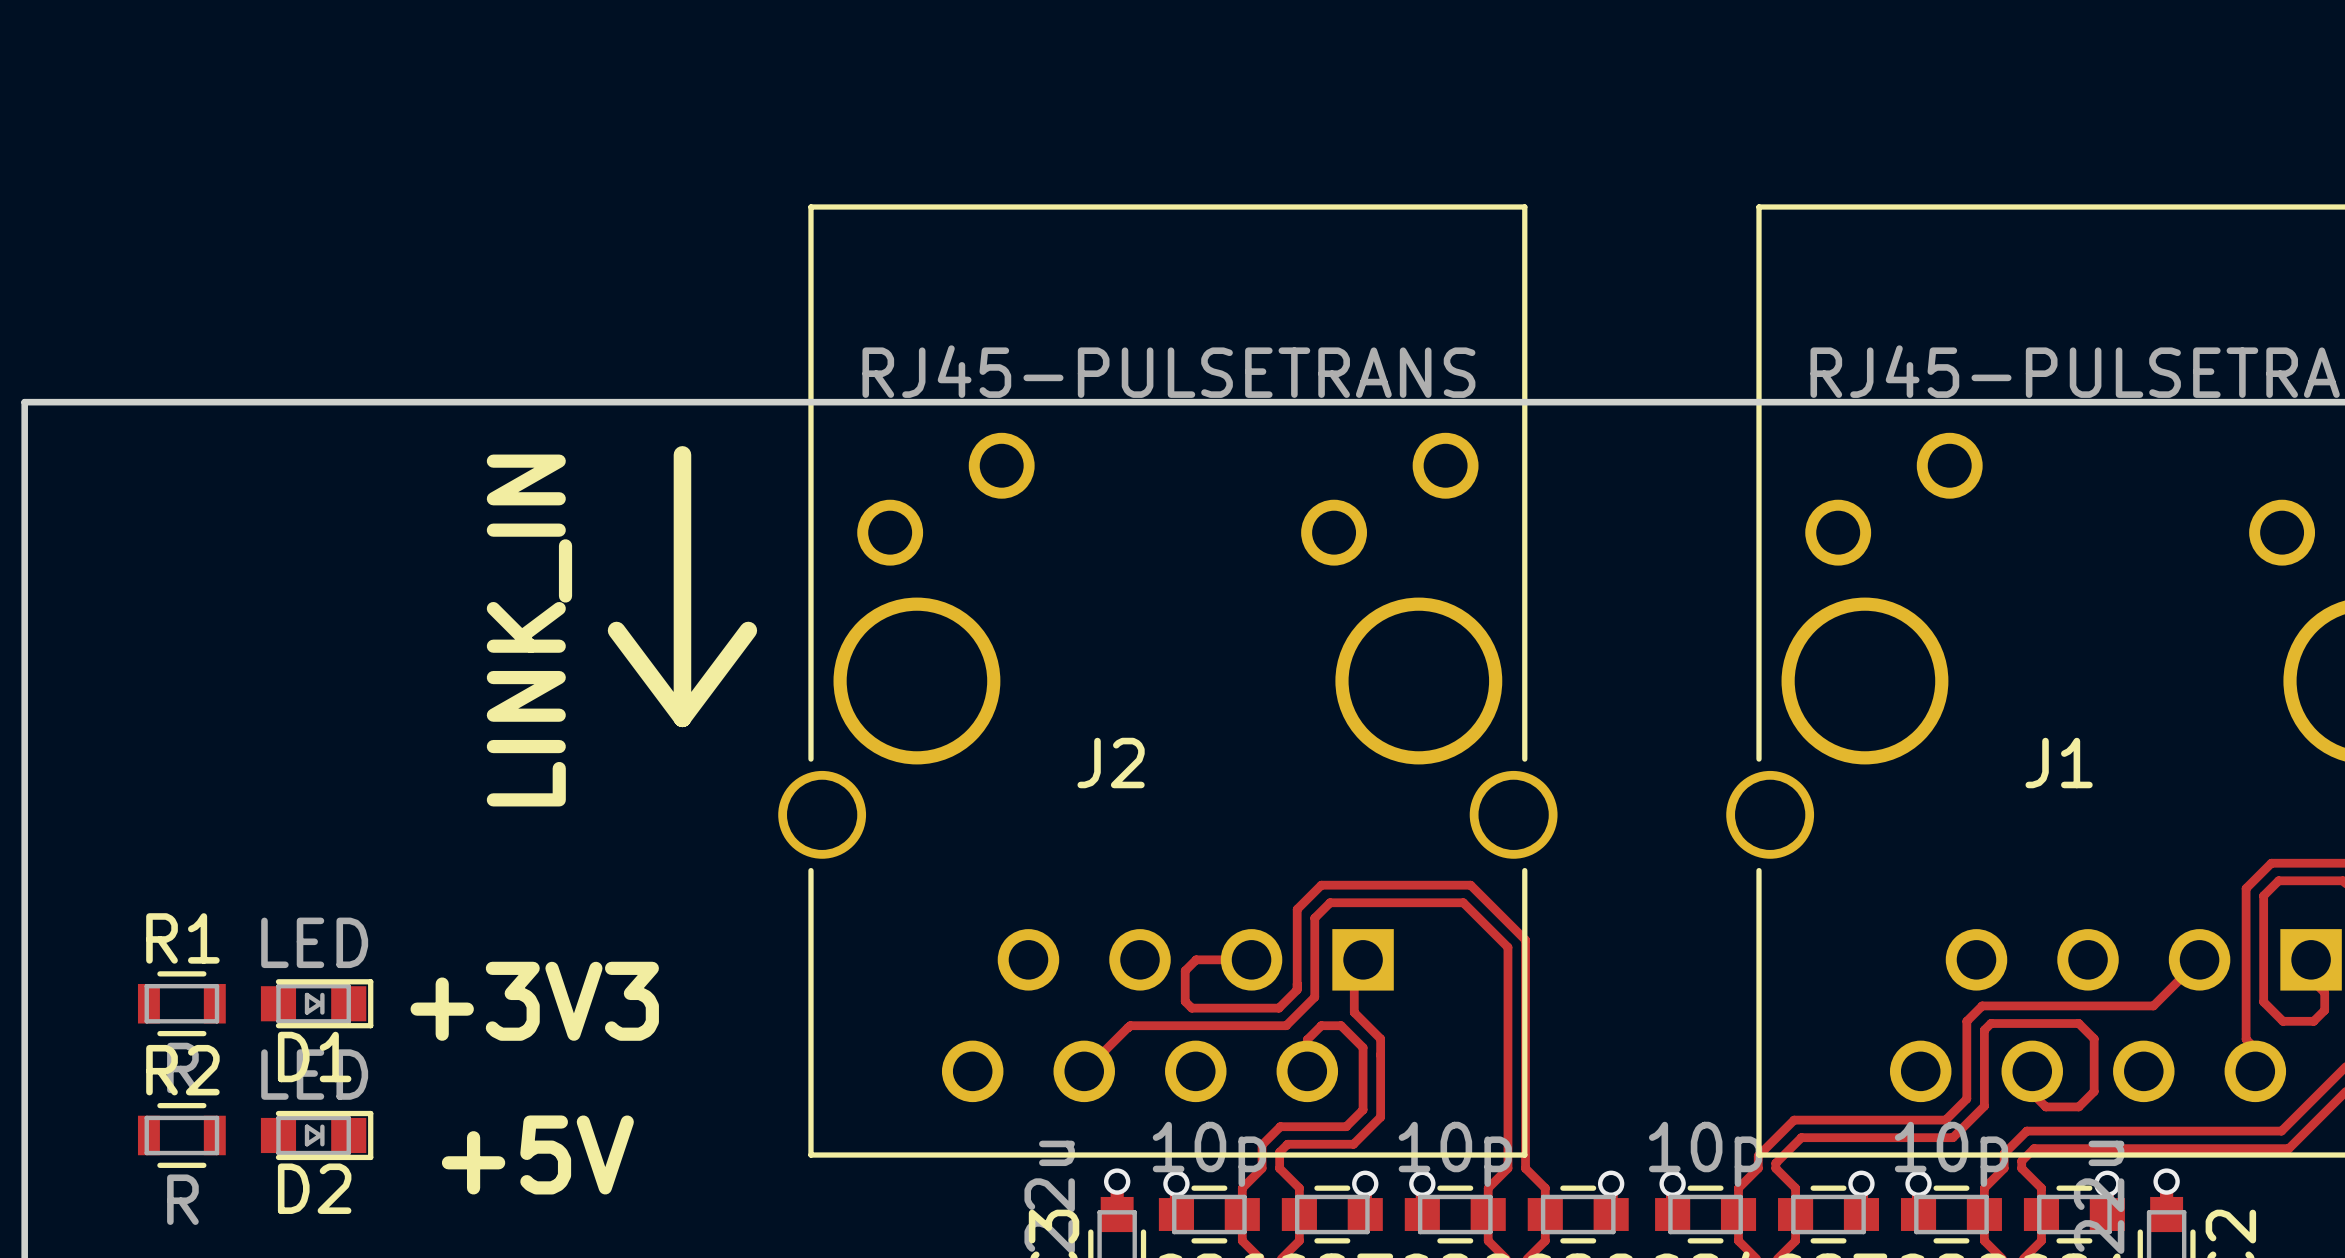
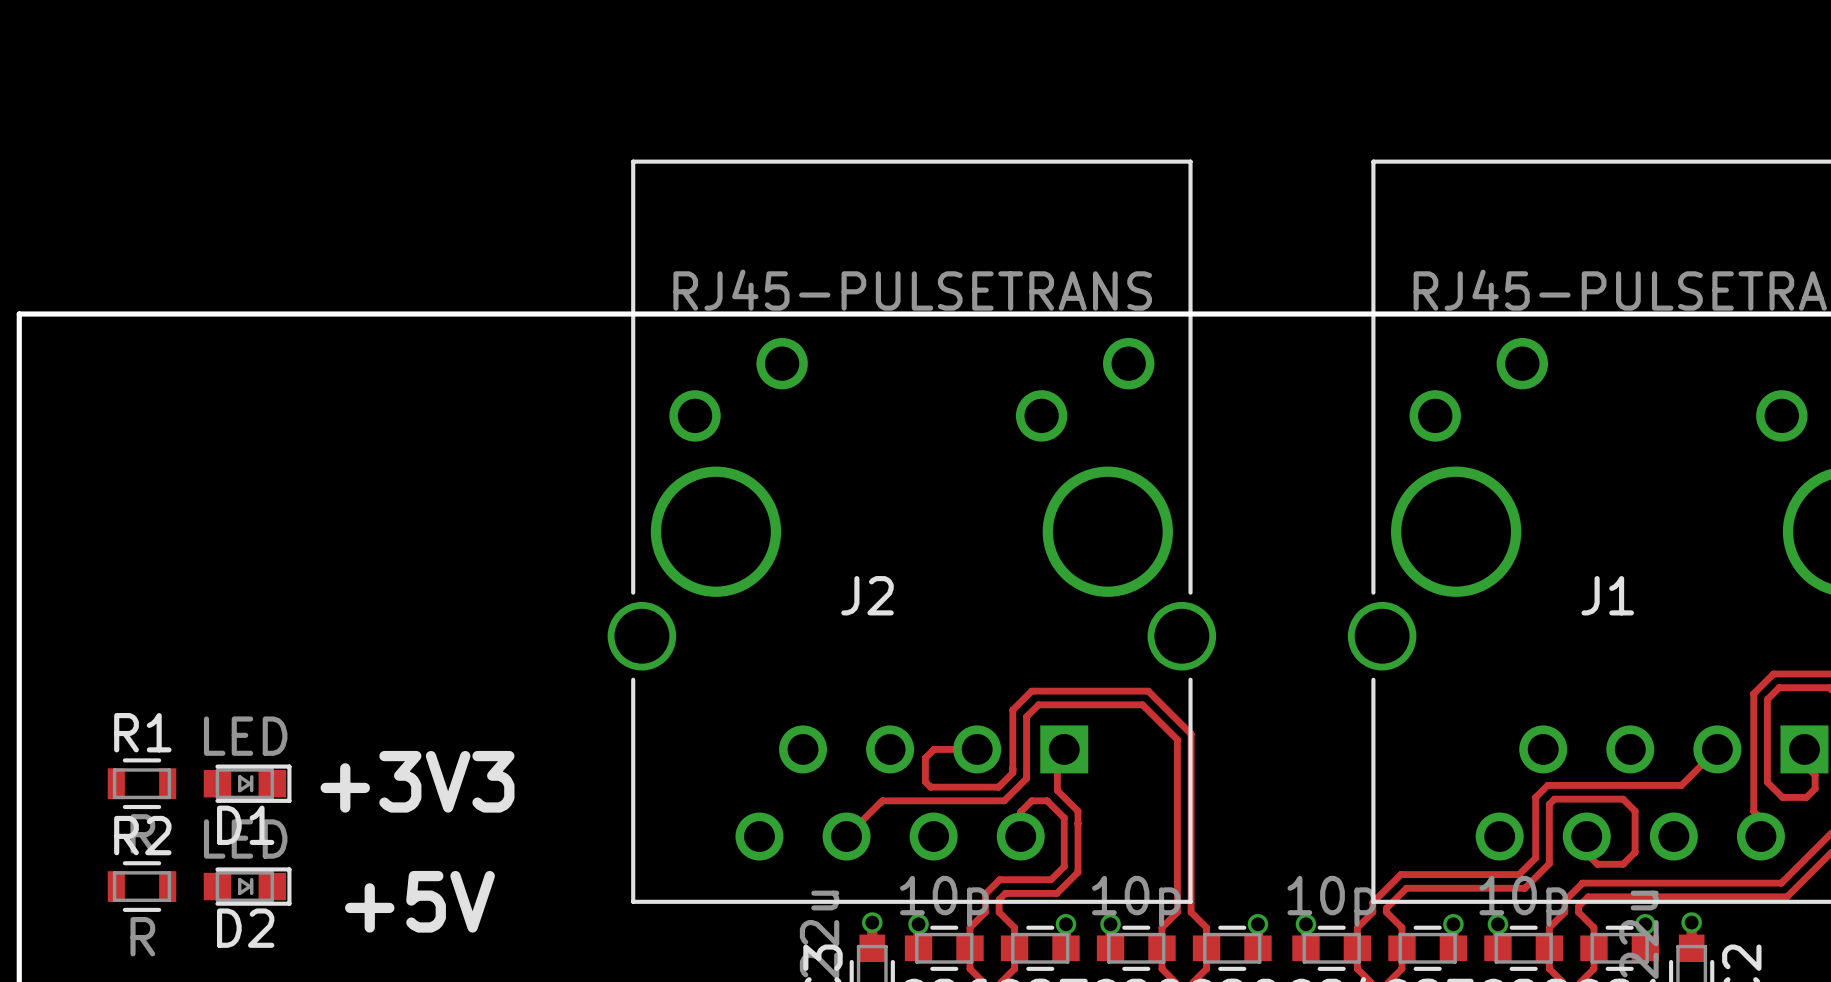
line: (682, 454) (682, 718) -> none
text: LINK_IN (529, 630) -> none
line: (616, 630) (682, 718) -> none
line: (748, 630) (682, 718) -> none

